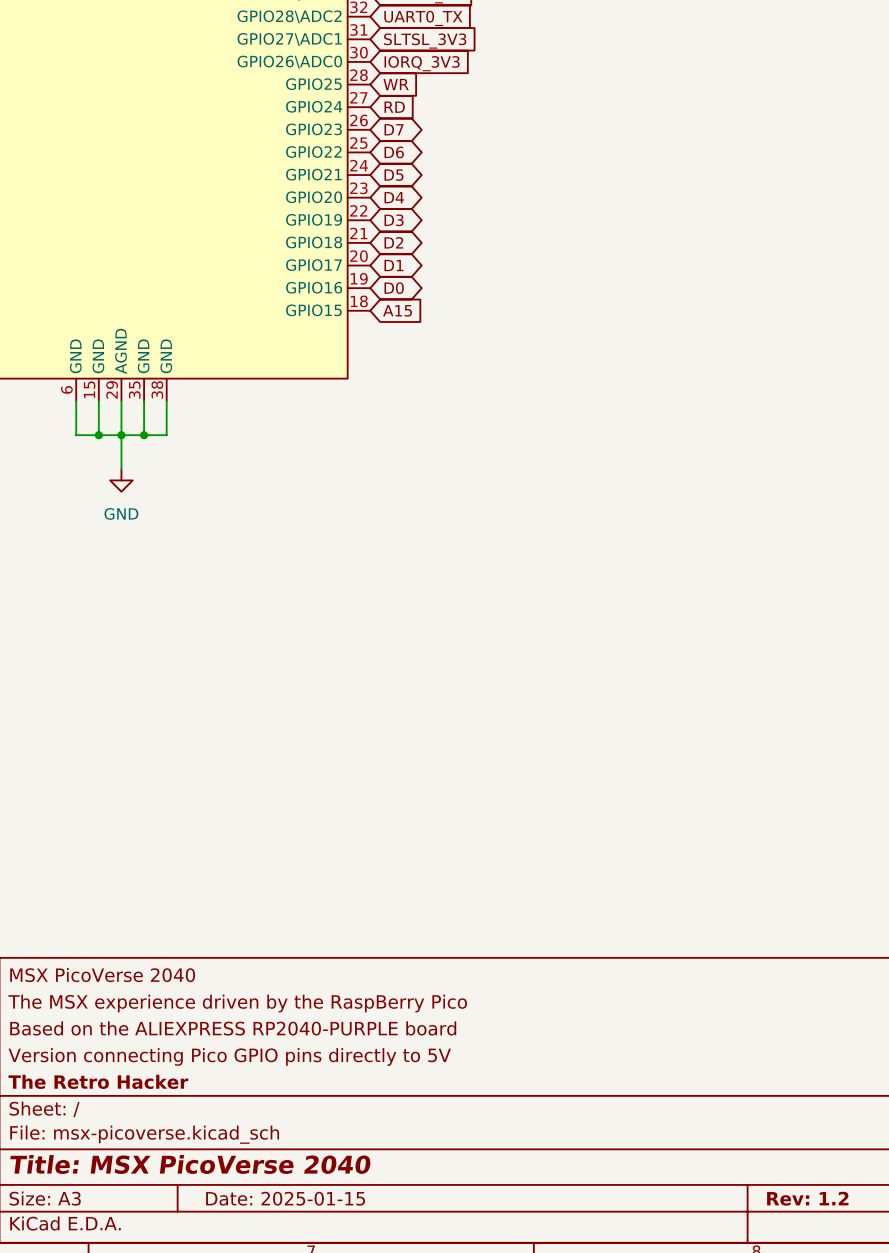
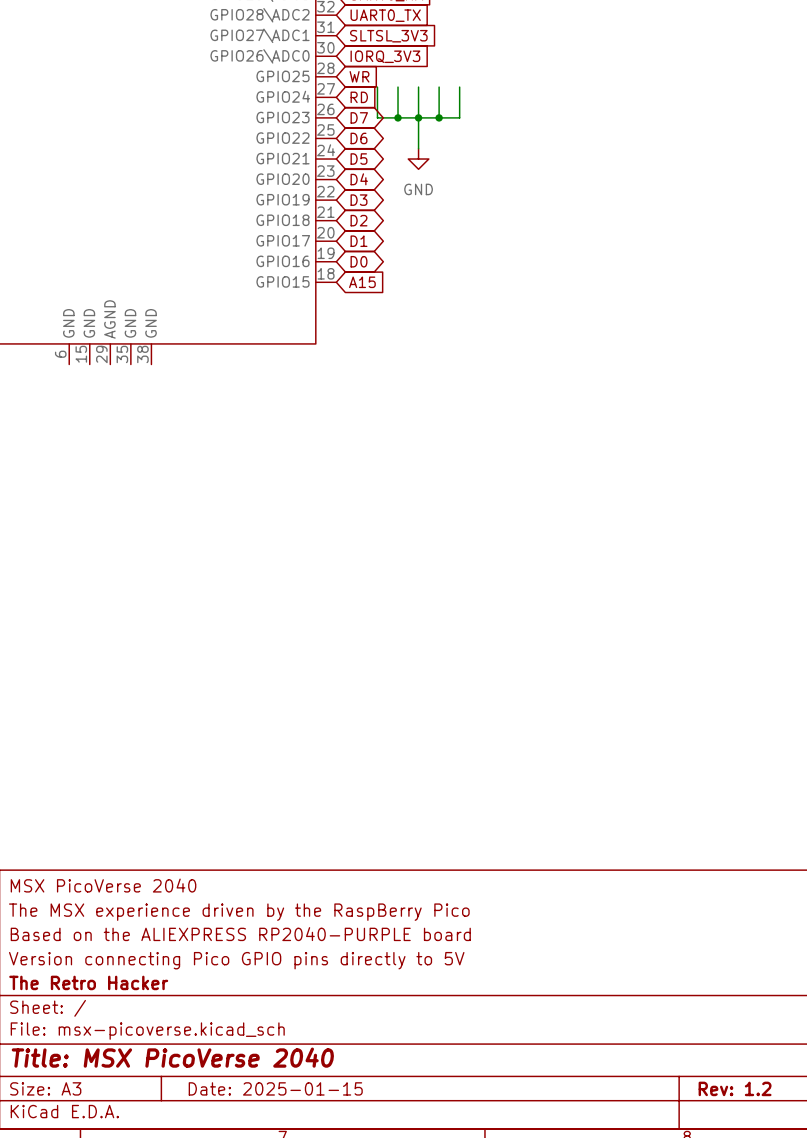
wire: none -> (377, 87) (377, 117) (459, 117) (459, 87)
wire: none -> (398, 87) (398, 117)
wire: none -> (418, 87) (418, 148)
wire: none -> (439, 87) (439, 117)
junction: none -> (398, 117)
junction: none -> (418, 117)
junction: none -> (439, 117)
power symbol: none -> GND (418, 159)
wire: (76, 401) (76, 435) (166, 435) (166, 401) -> none
wire: (98, 401) (98, 435) -> none
wire: (121, 401) (121, 469) -> none
wire: (144, 401) (144, 435) -> none
junction: (98, 435) -> none
junction: (121, 435) -> none
junction: (144, 435) -> none
power symbol: GND (121, 480) -> none

